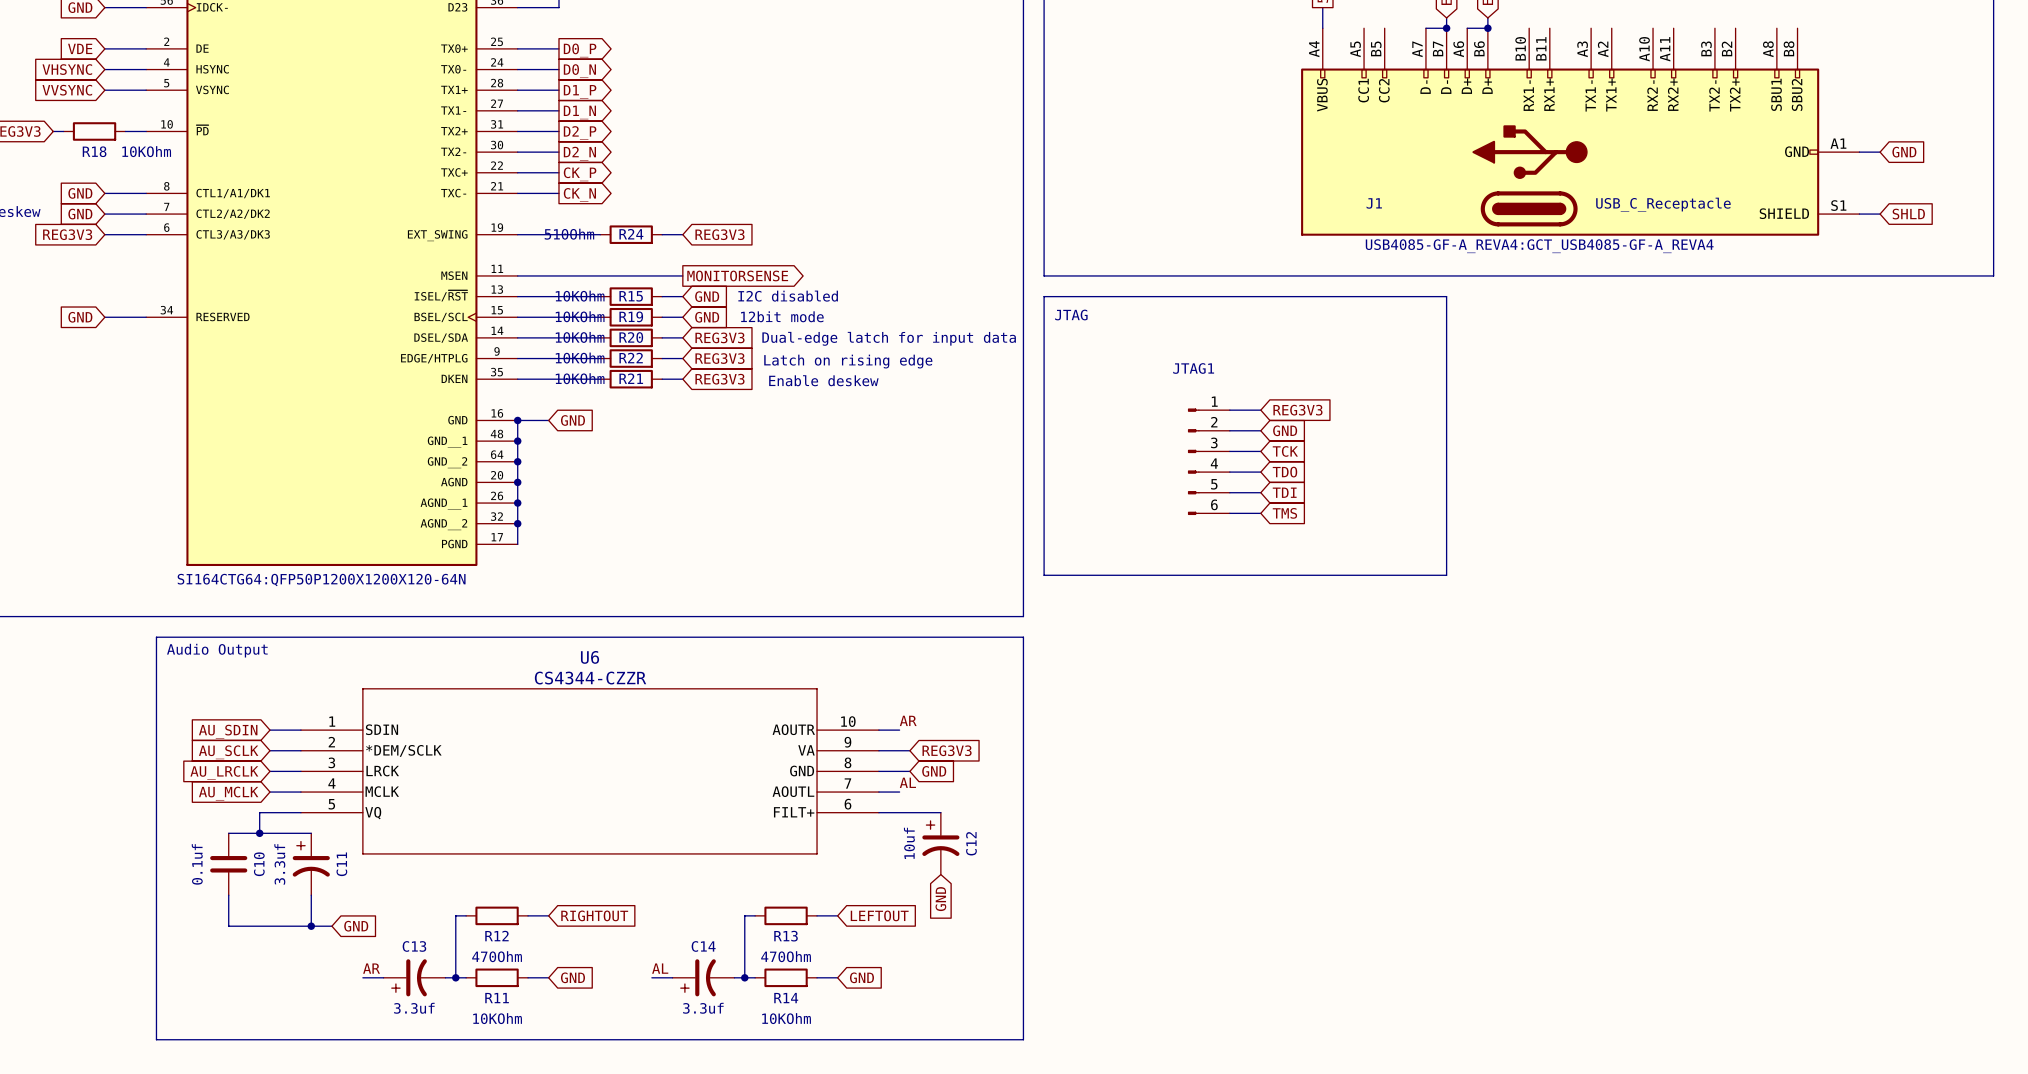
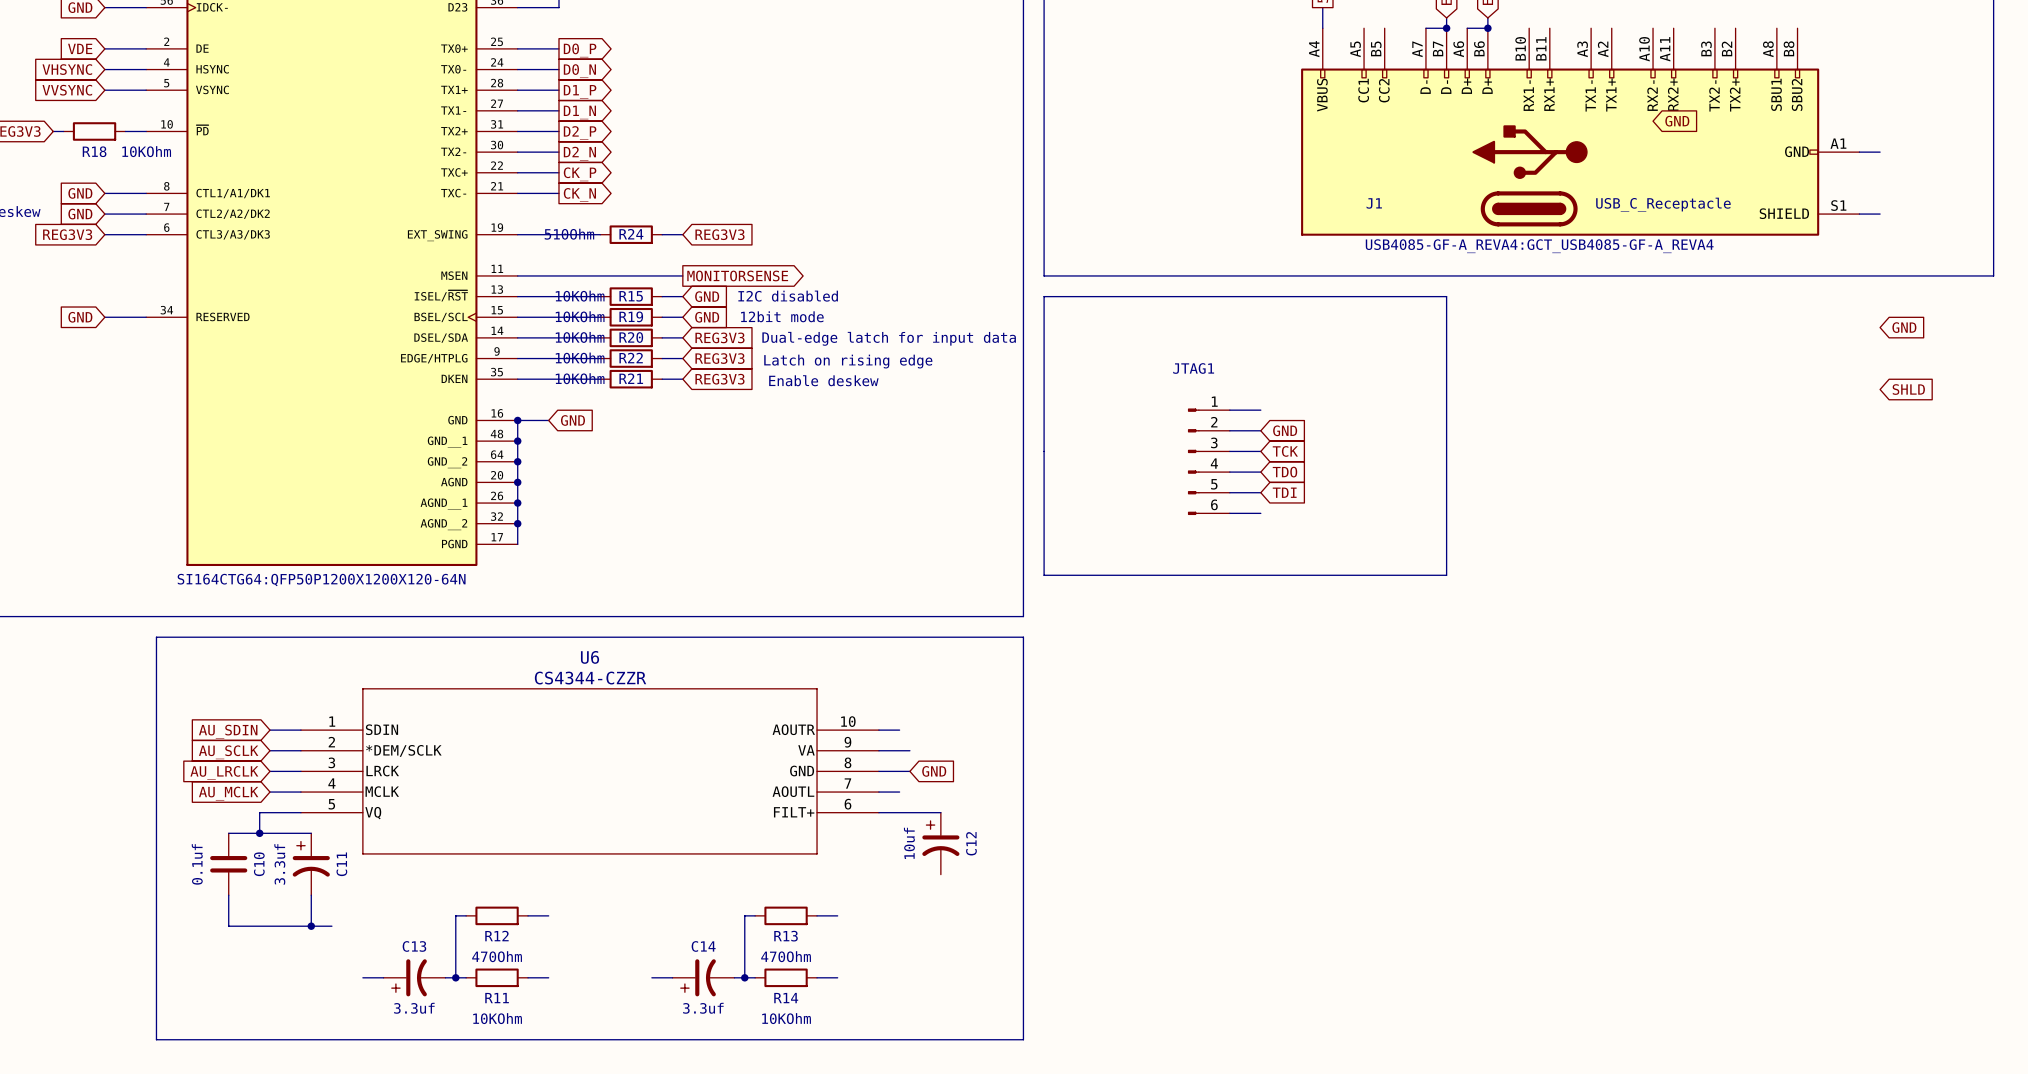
global label: none -> GND (1677, 121)
global label: GND (1904, 152) -> none
global label position: SHLD (1908, 214) -> SHLD (1908, 389)
text: JTAG (1071, 315) -> none
global label: none -> GND (1904, 327)
global label: REG3V3 (1297, 410) -> none
global label: TMS (1284, 513) -> none
text: Audio Output (217, 650) -> none
label: AR (908, 720) -> none
global label: REG3V3 (947, 750) -> none
label: AL (907, 782) -> none
global label: GND (940, 899) -> none
global label: RIGHTOUT (594, 915) -> none
global label: LEFTOUT (879, 915) -> none
global label: GND (356, 926) -> none
label: AR (371, 968) -> none
label: AL (660, 968) -> none
global label: GND (572, 977) -> none
global label: GND (861, 977) -> none

